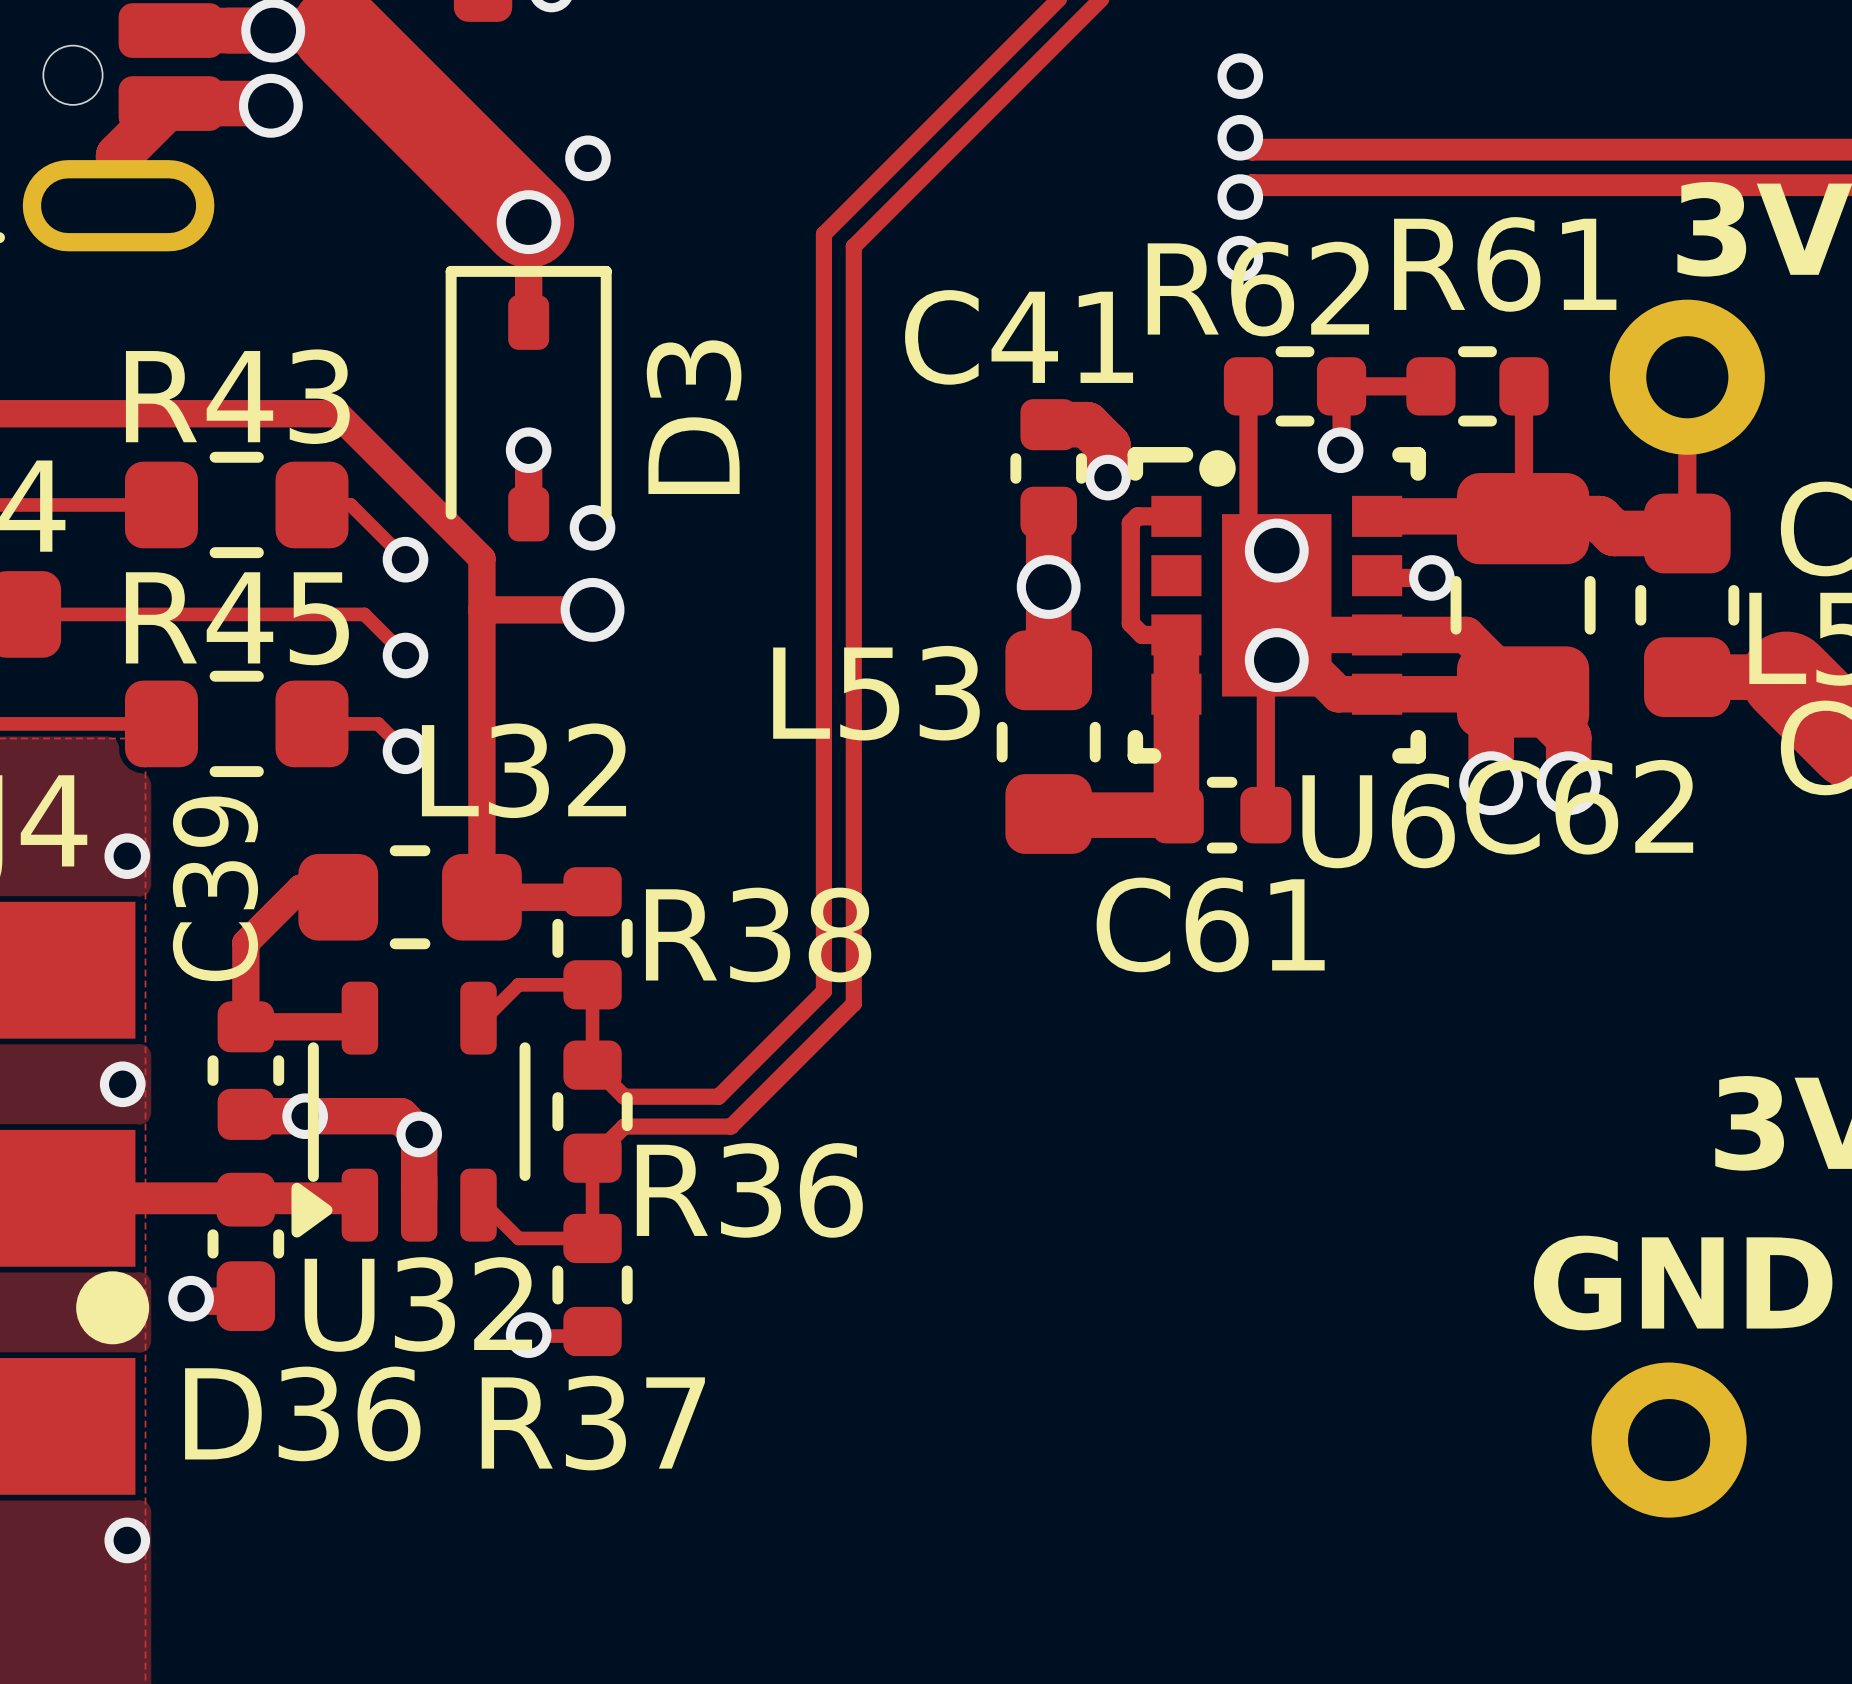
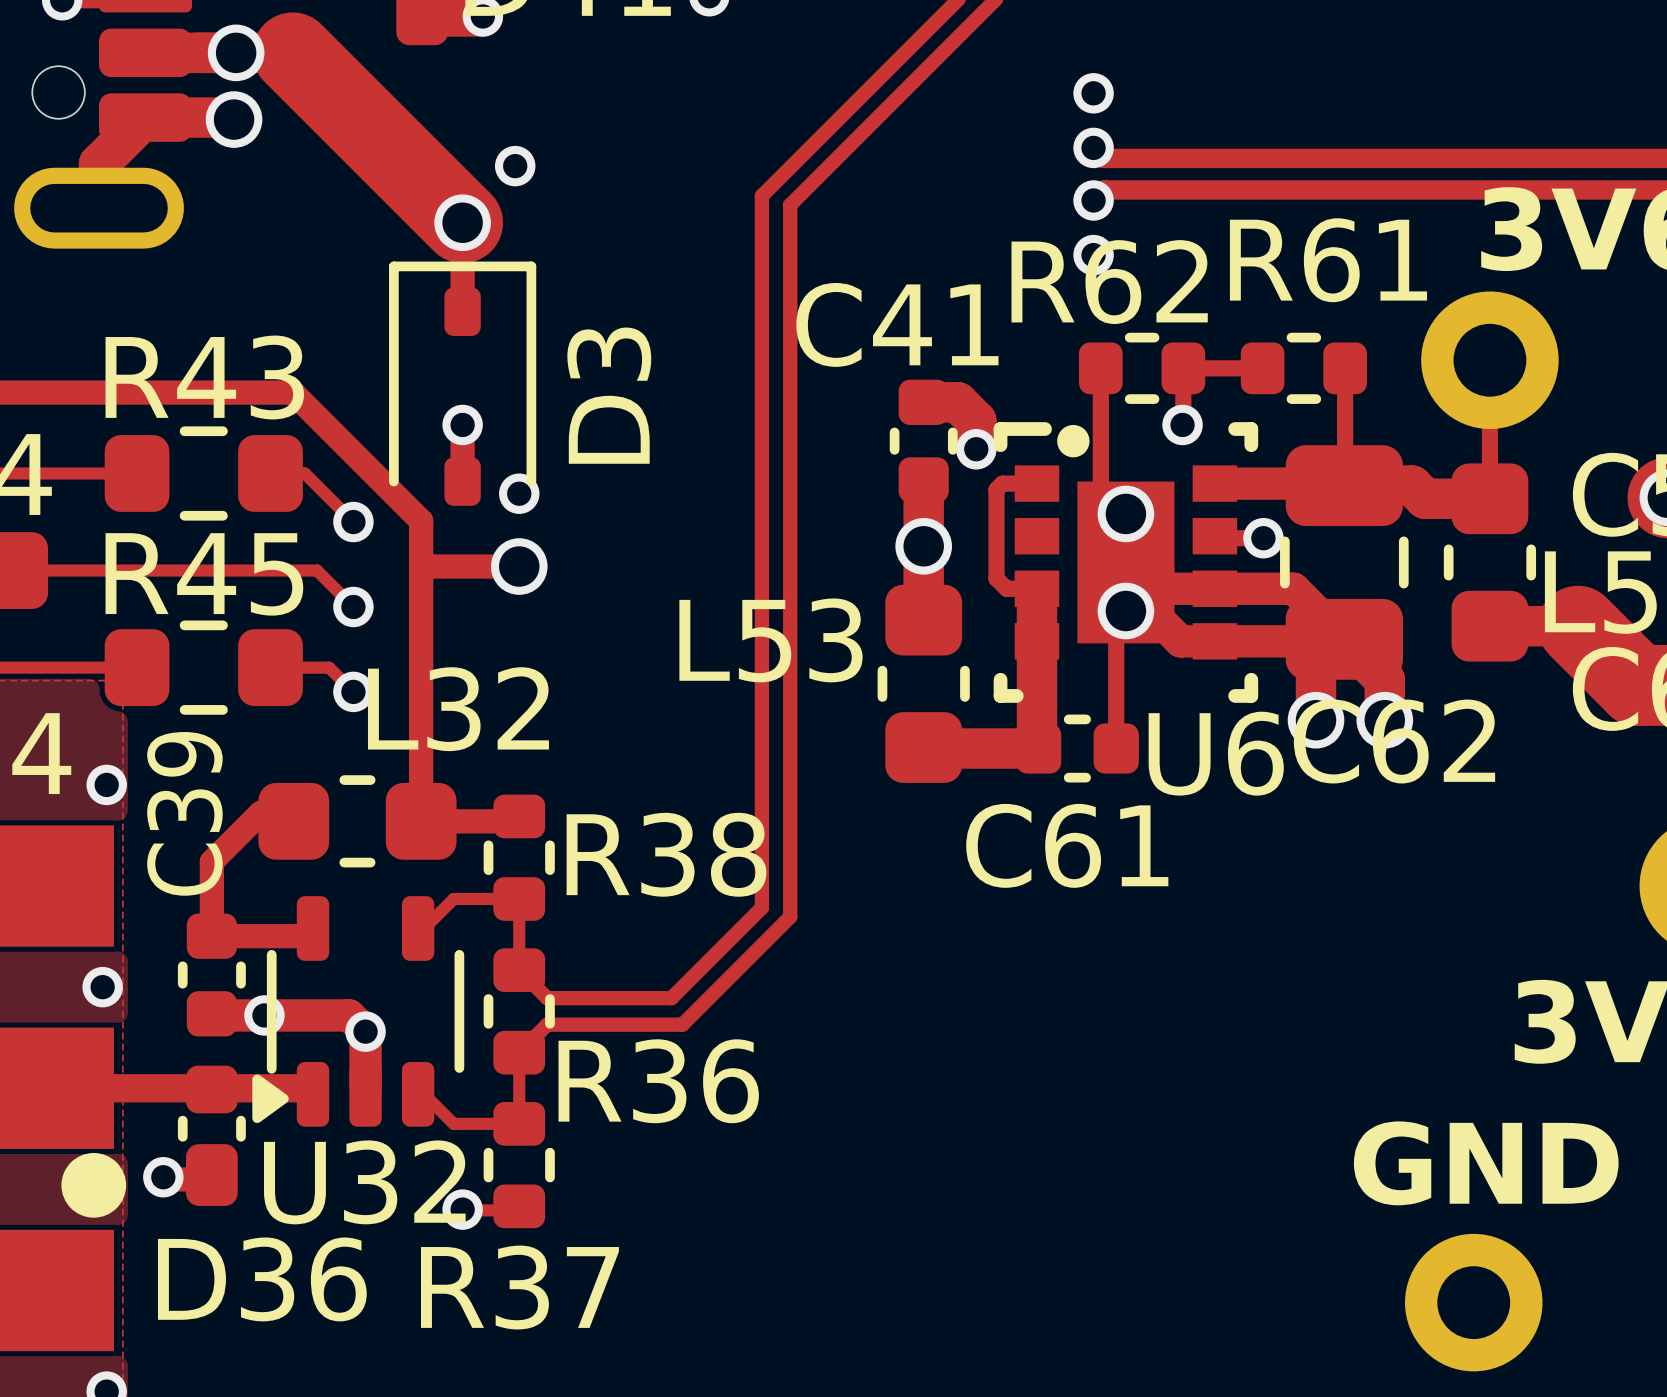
track: (866, 191) (823, 234) (823, 991) (718, 1096) -> (761, 195) (761, 907) (671, 998) (631, 998)
track: (898, 202) (853, 246) (853, 1003) (731, 1126) -> (790, 205) (790, 916) (682, 1024) (642, 1024)

